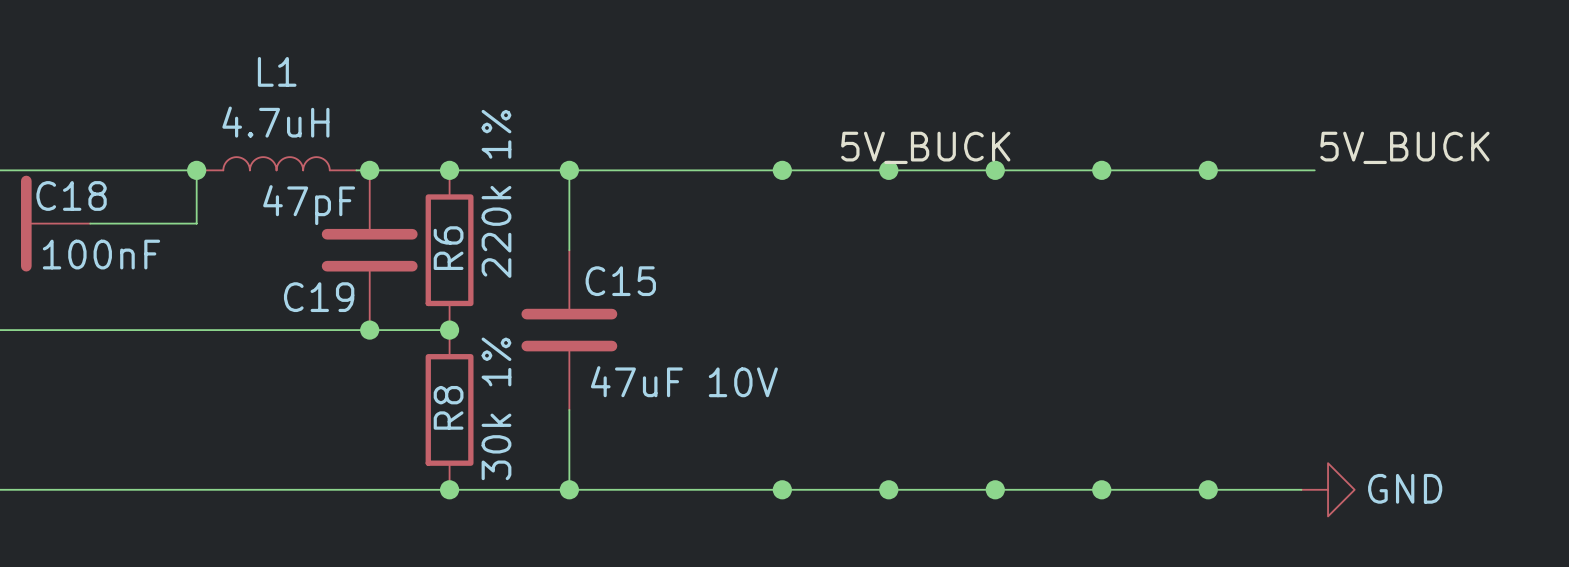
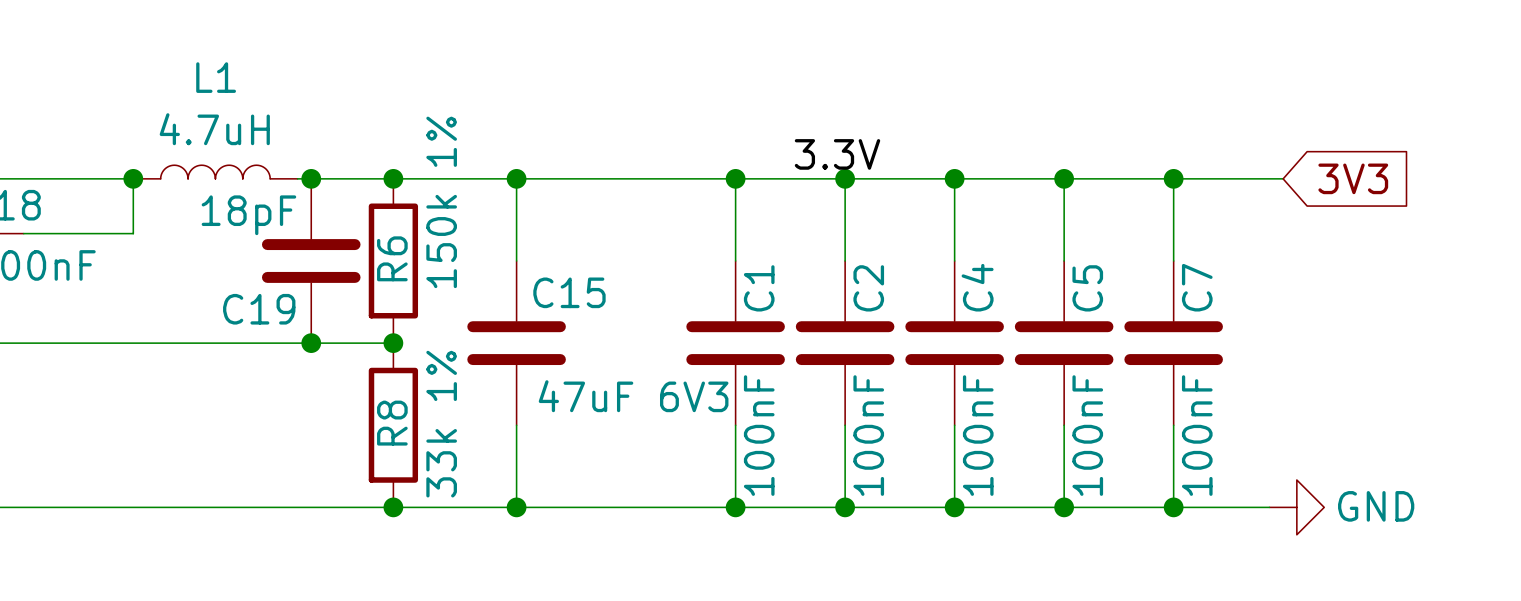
label: 5V_BUCK (925, 147) -> 3.3V (837, 154)
label: 5V_BUCK (1404, 147) -> none
wire: none -> (735, 178) (735, 260)
wire: none -> (845, 178) (845, 260)
wire: none -> (954, 178) (954, 260)
wire: none -> (1064, 178) (1064, 260)
wire: none -> (1173, 178) (1173, 260)
global label: none -> 3V3 (1353, 178)
R6 value: 220k 1% (496, 193) -> 150k 1% (441, 202)
C19 value: 47pF (309, 205) -> 18pF (248, 215)
C1: none -> 100nF (735, 343)
C2: none -> 100nF (845, 343)
C4: none -> 100nF (954, 343)
C5: none -> 100nF (1064, 343)
C7: none -> 100nF (1173, 343)
C15 value: 47uF 10V (684, 381) -> 47uF 6V3 (633, 396)
R8 value: 30k 1% (496, 408) -> 33k 1% (441, 424)
wire: none -> (735, 425) (735, 507)
wire: none -> (845, 425) (845, 507)
wire: none -> (954, 425) (954, 507)
wire: none -> (1064, 425) (1064, 507)
wire: none -> (1173, 425) (1173, 507)

